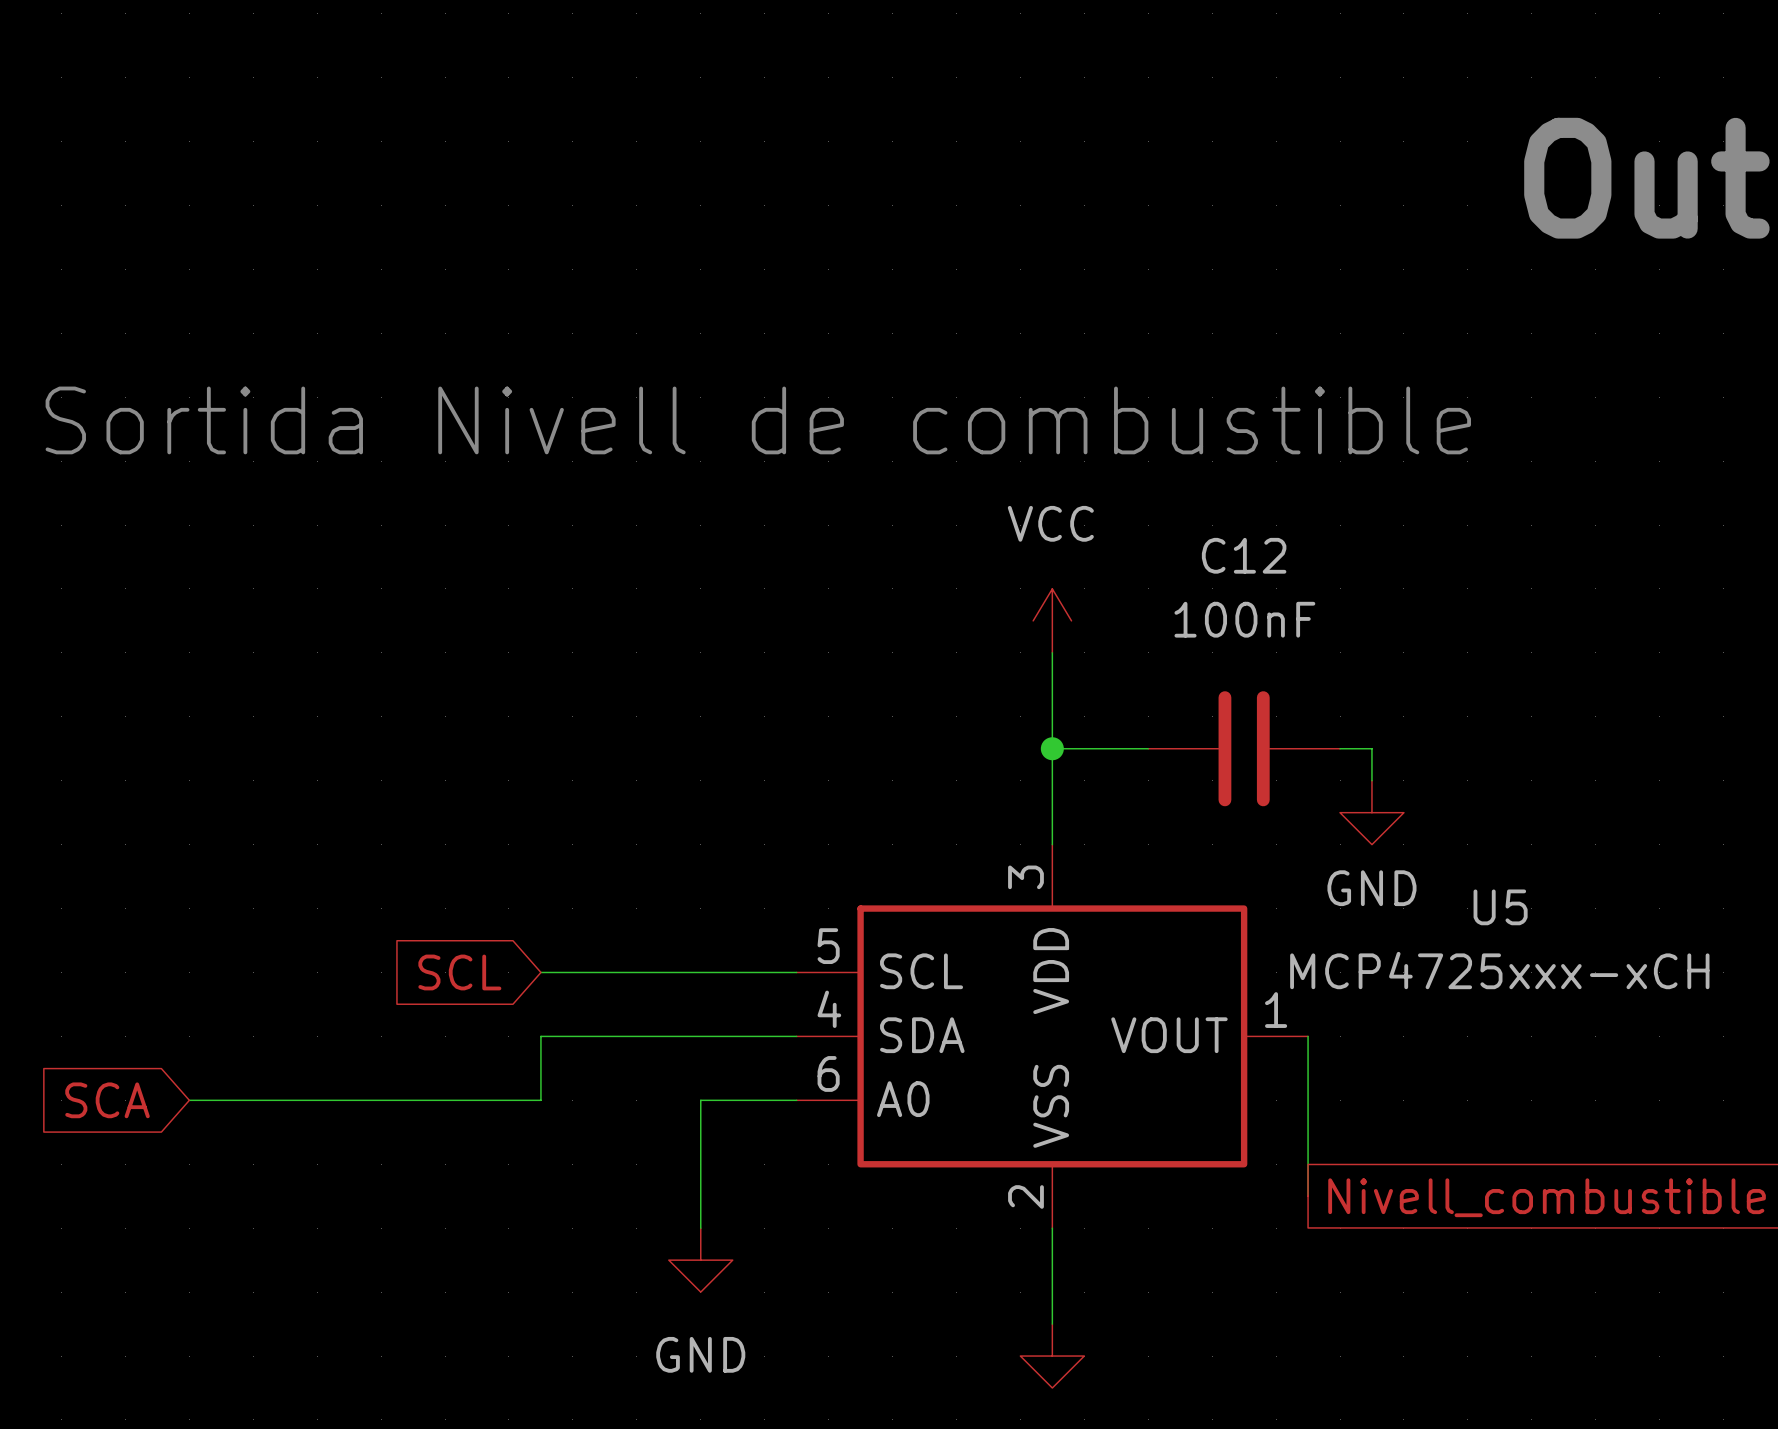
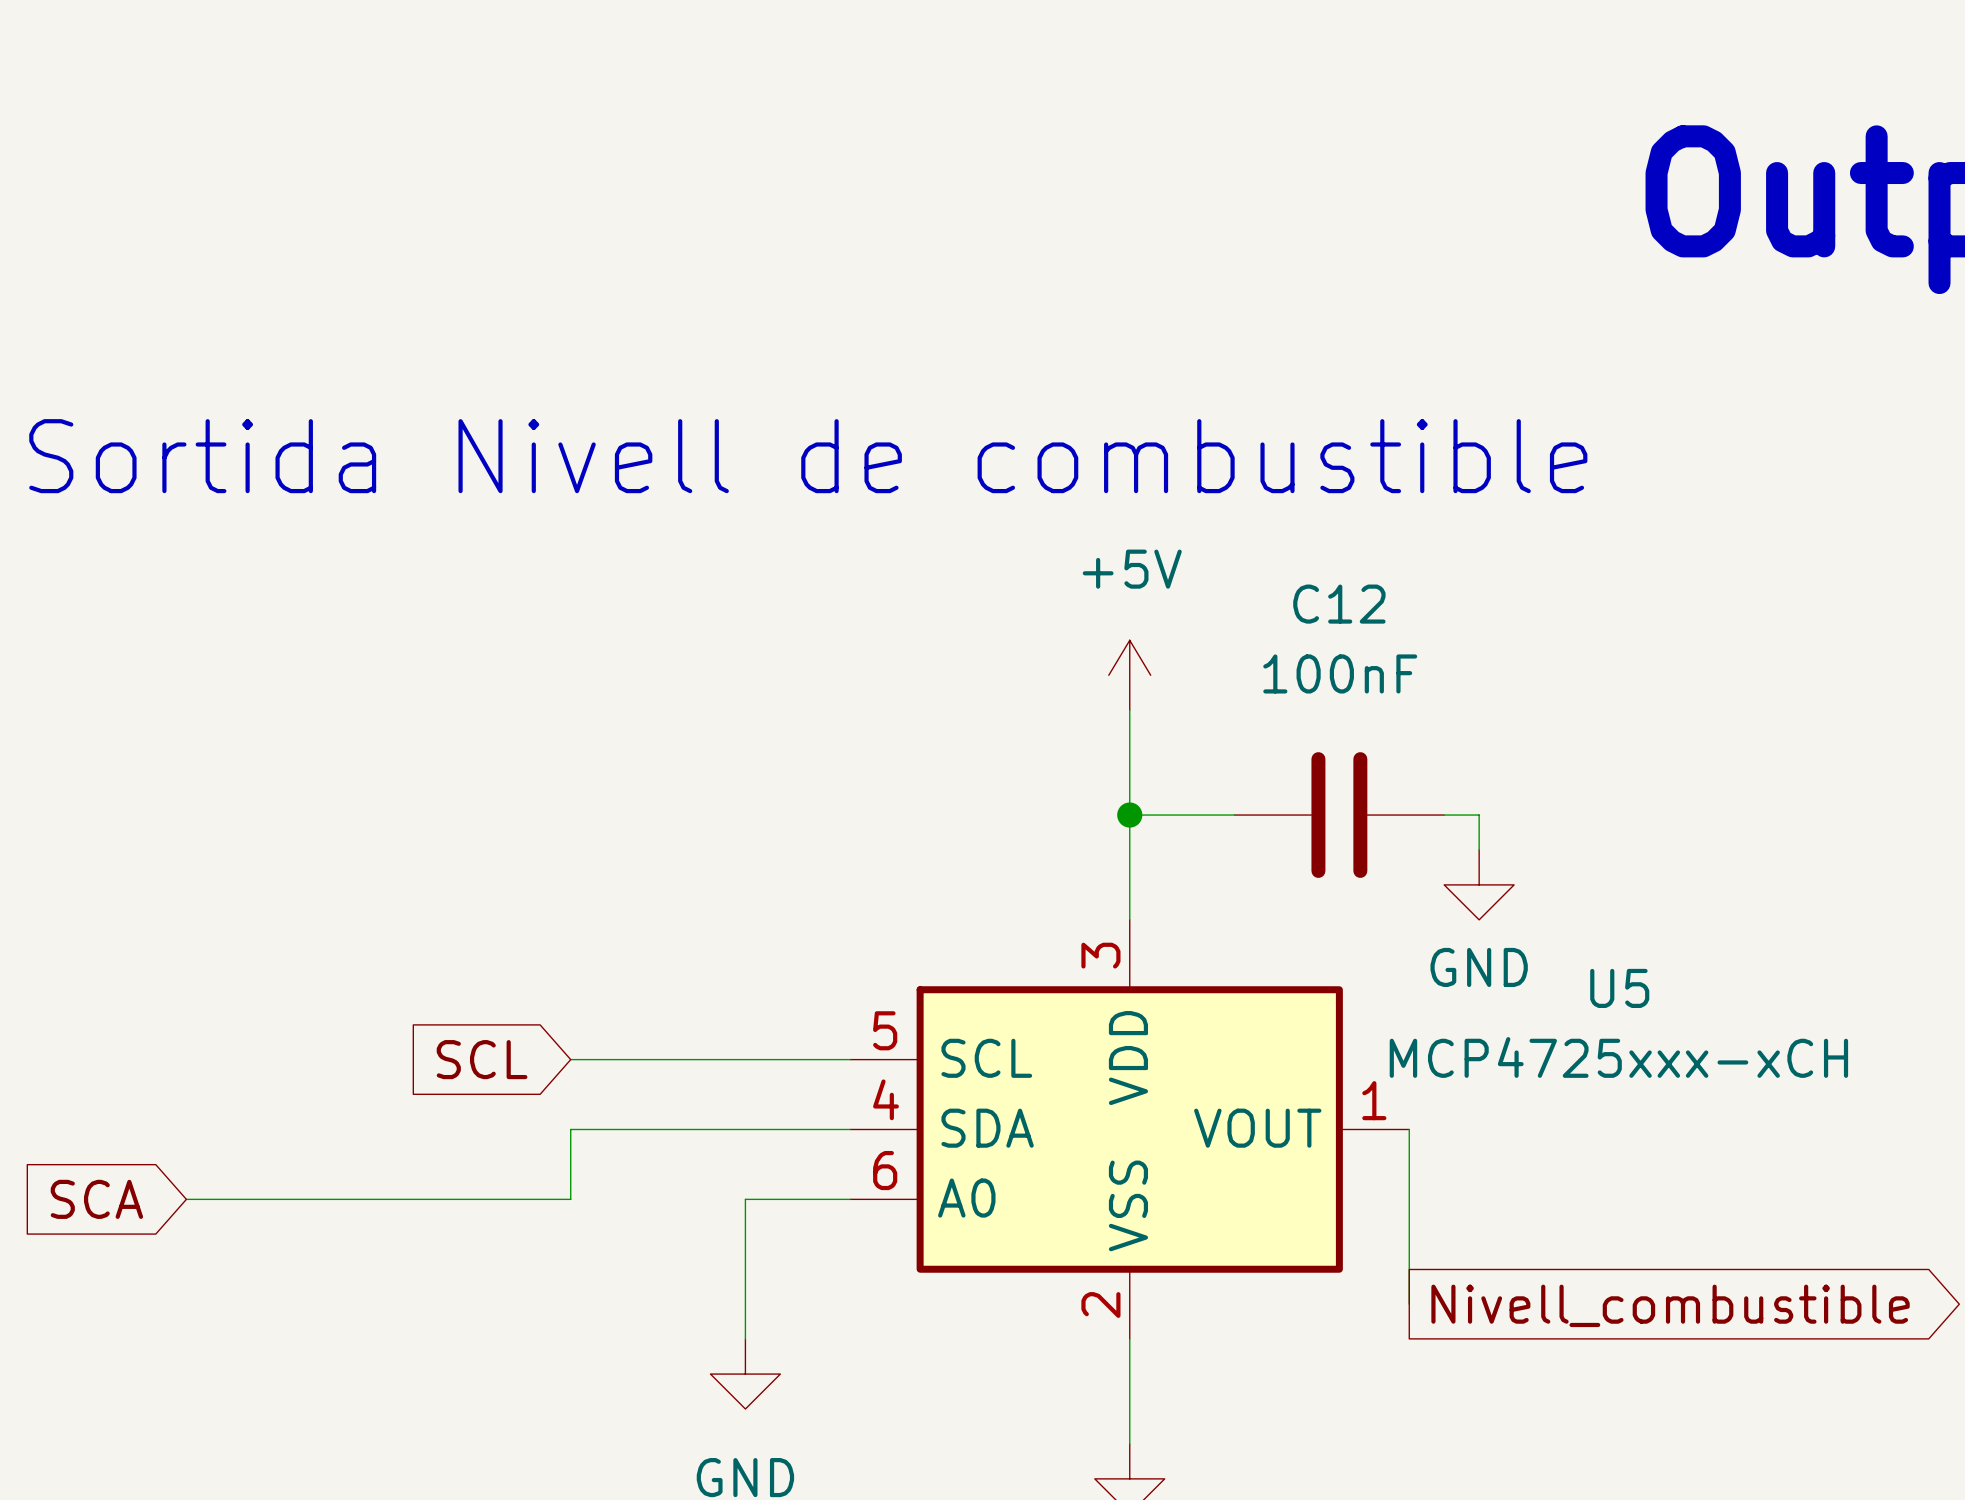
power symbol: VCC (1052, 620) -> +5V (1129, 675)

